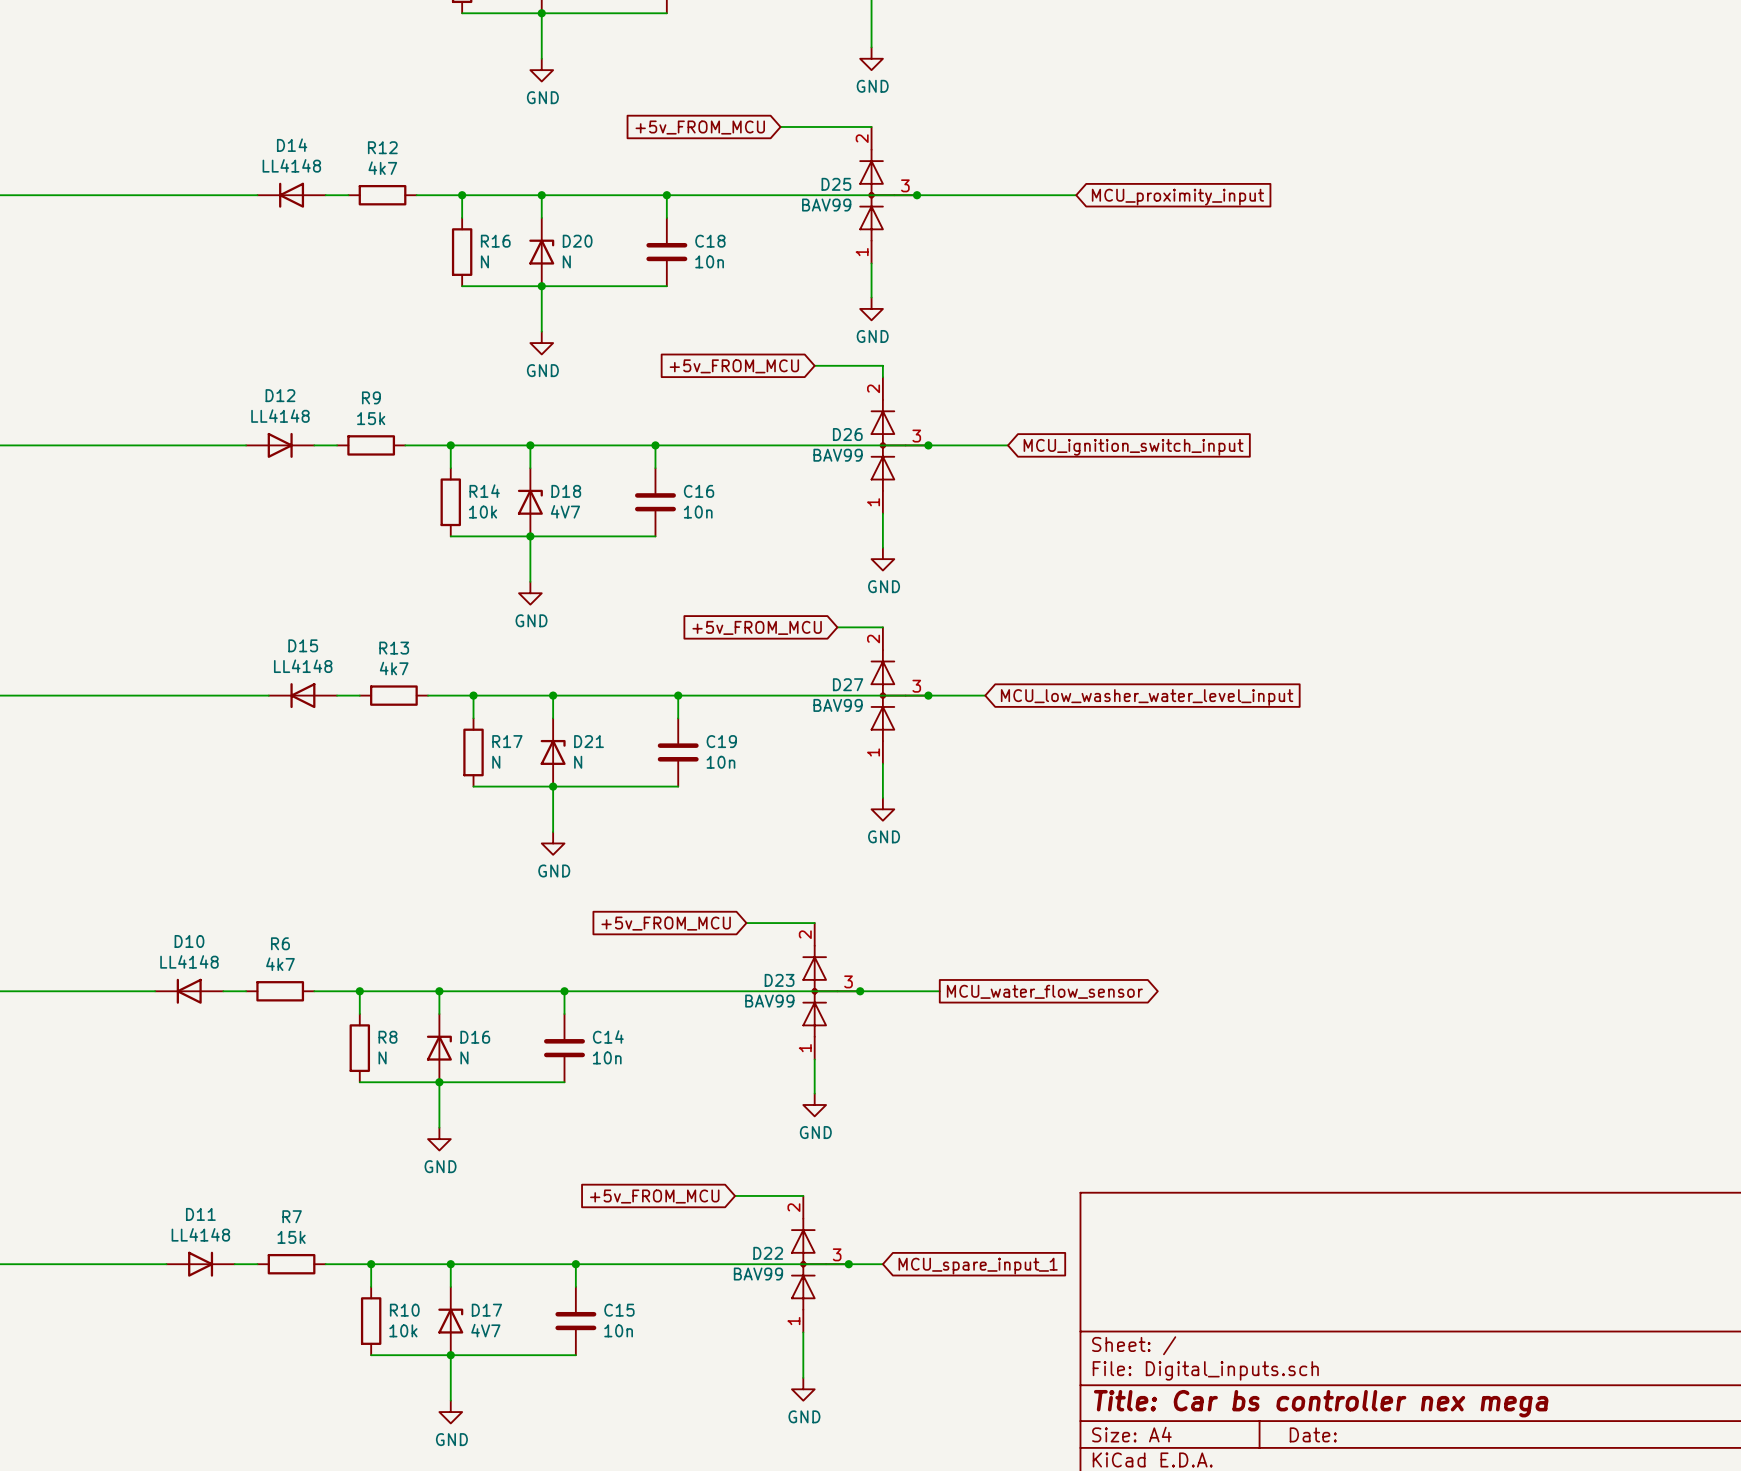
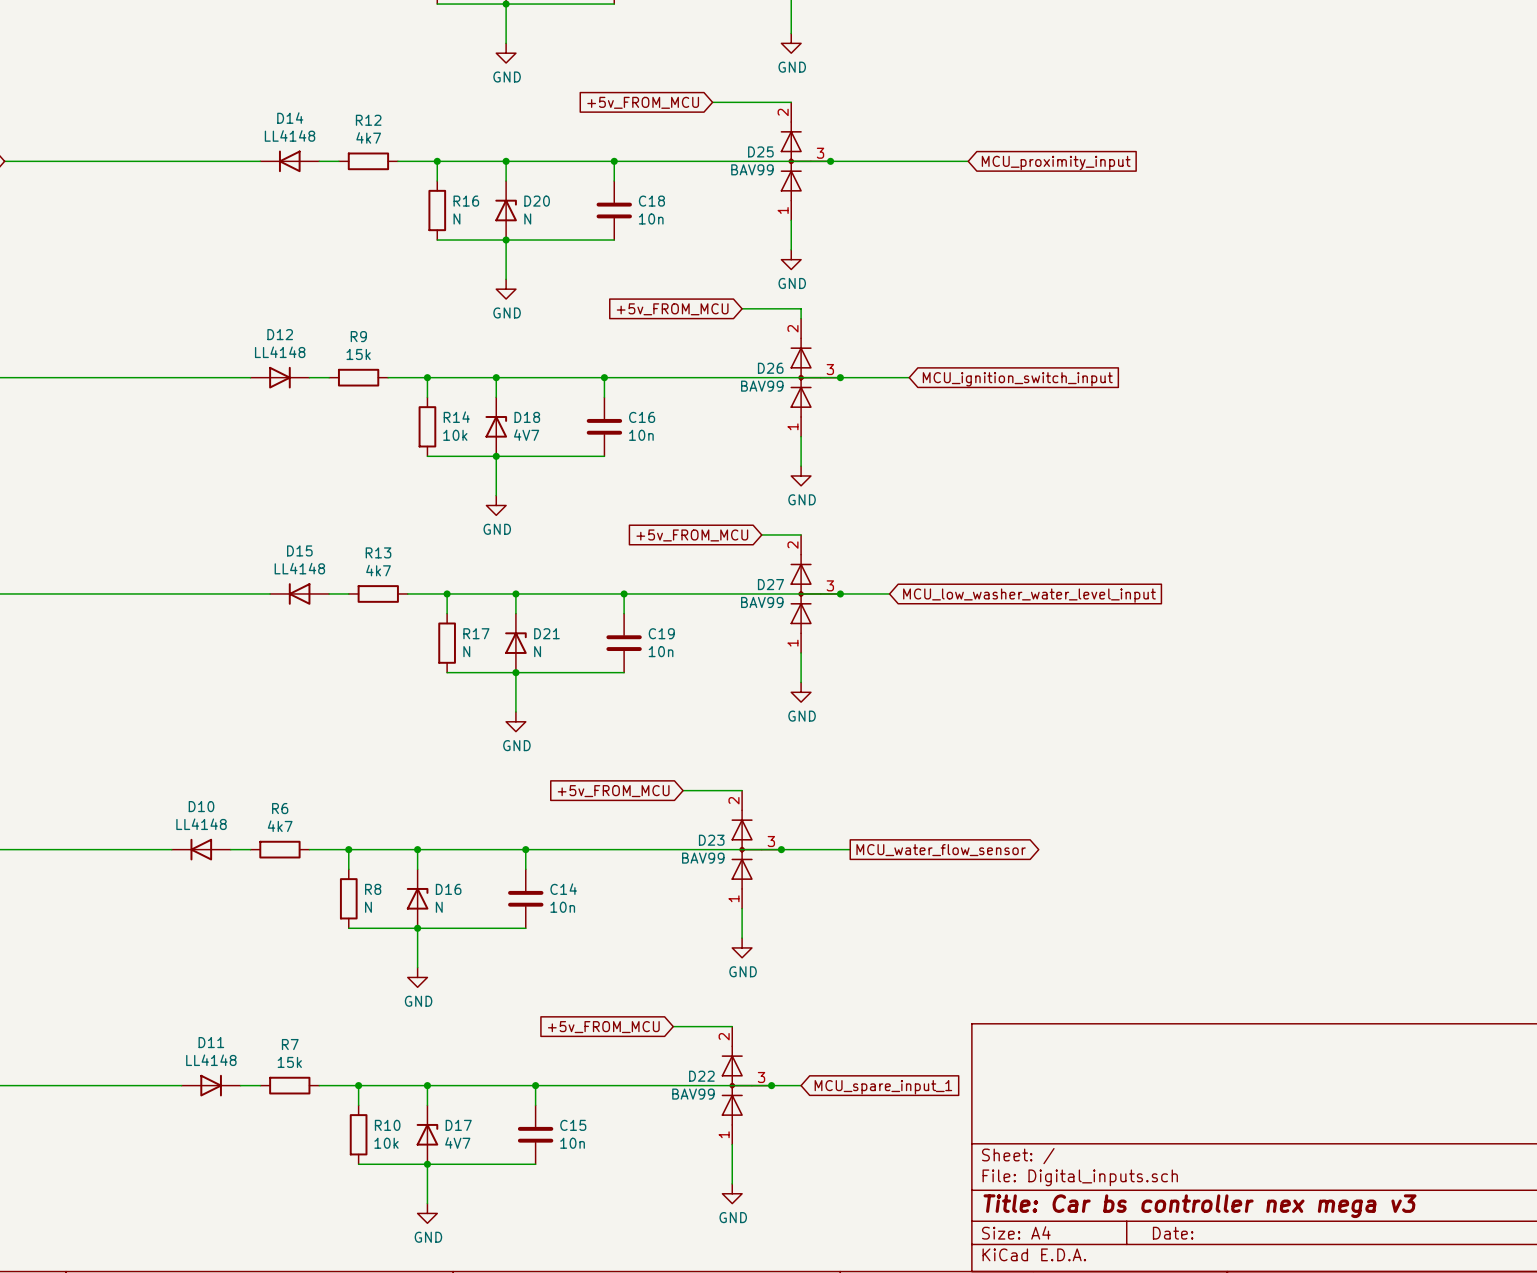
title block: Title: Car bs controller nex mega (1321, 1403) -> Title: Car bs controller nex mega v3 (1200, 1206)

